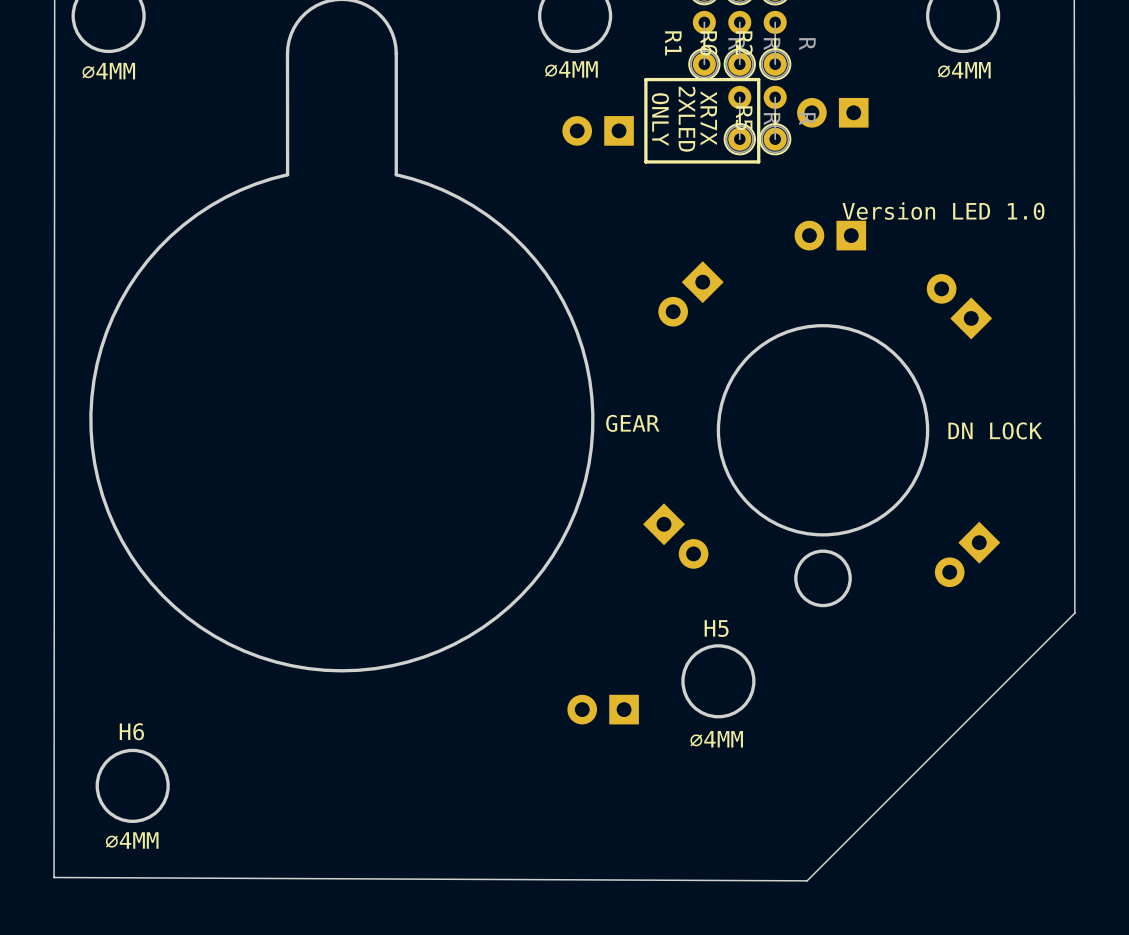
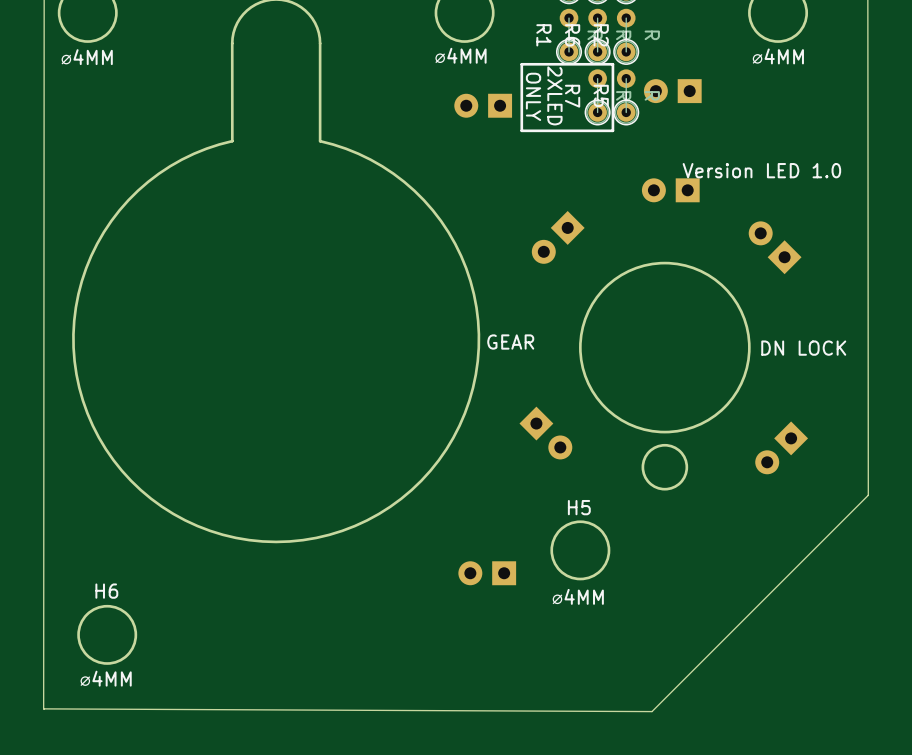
XR7X name: XR7X (708, 118) -> R7 (572, 96)

